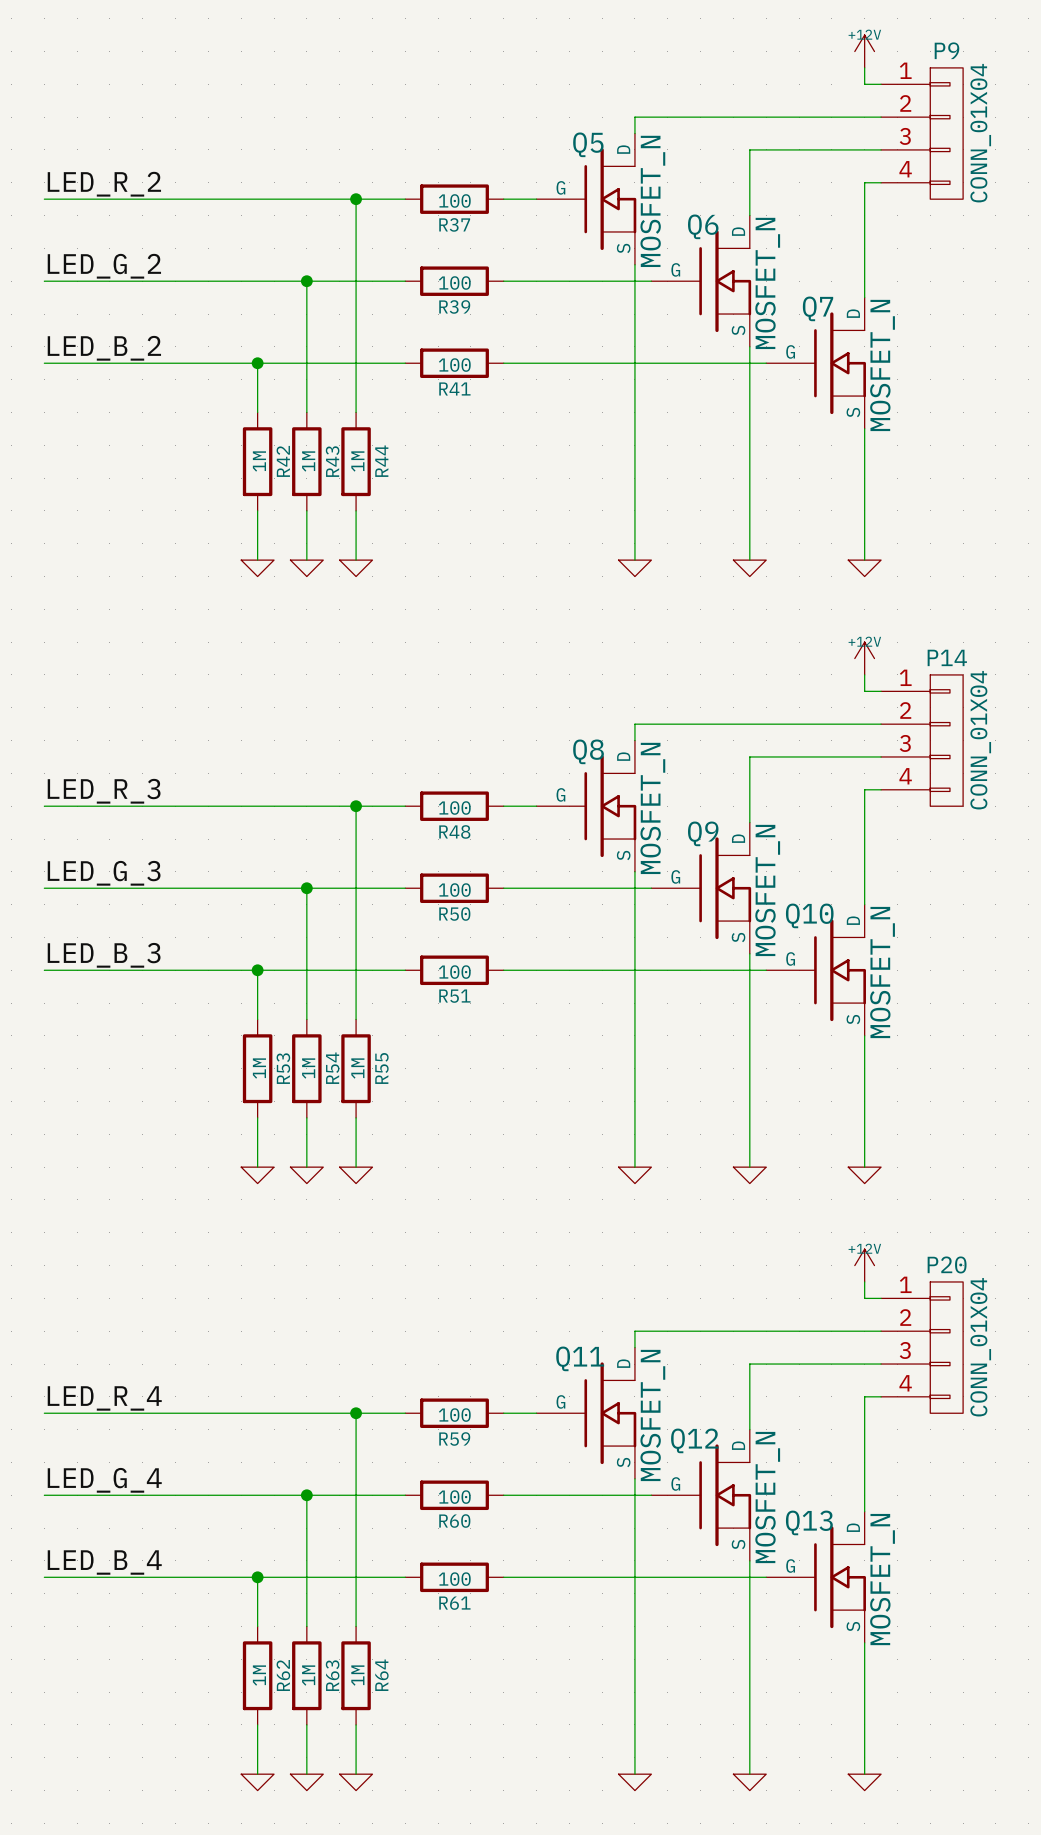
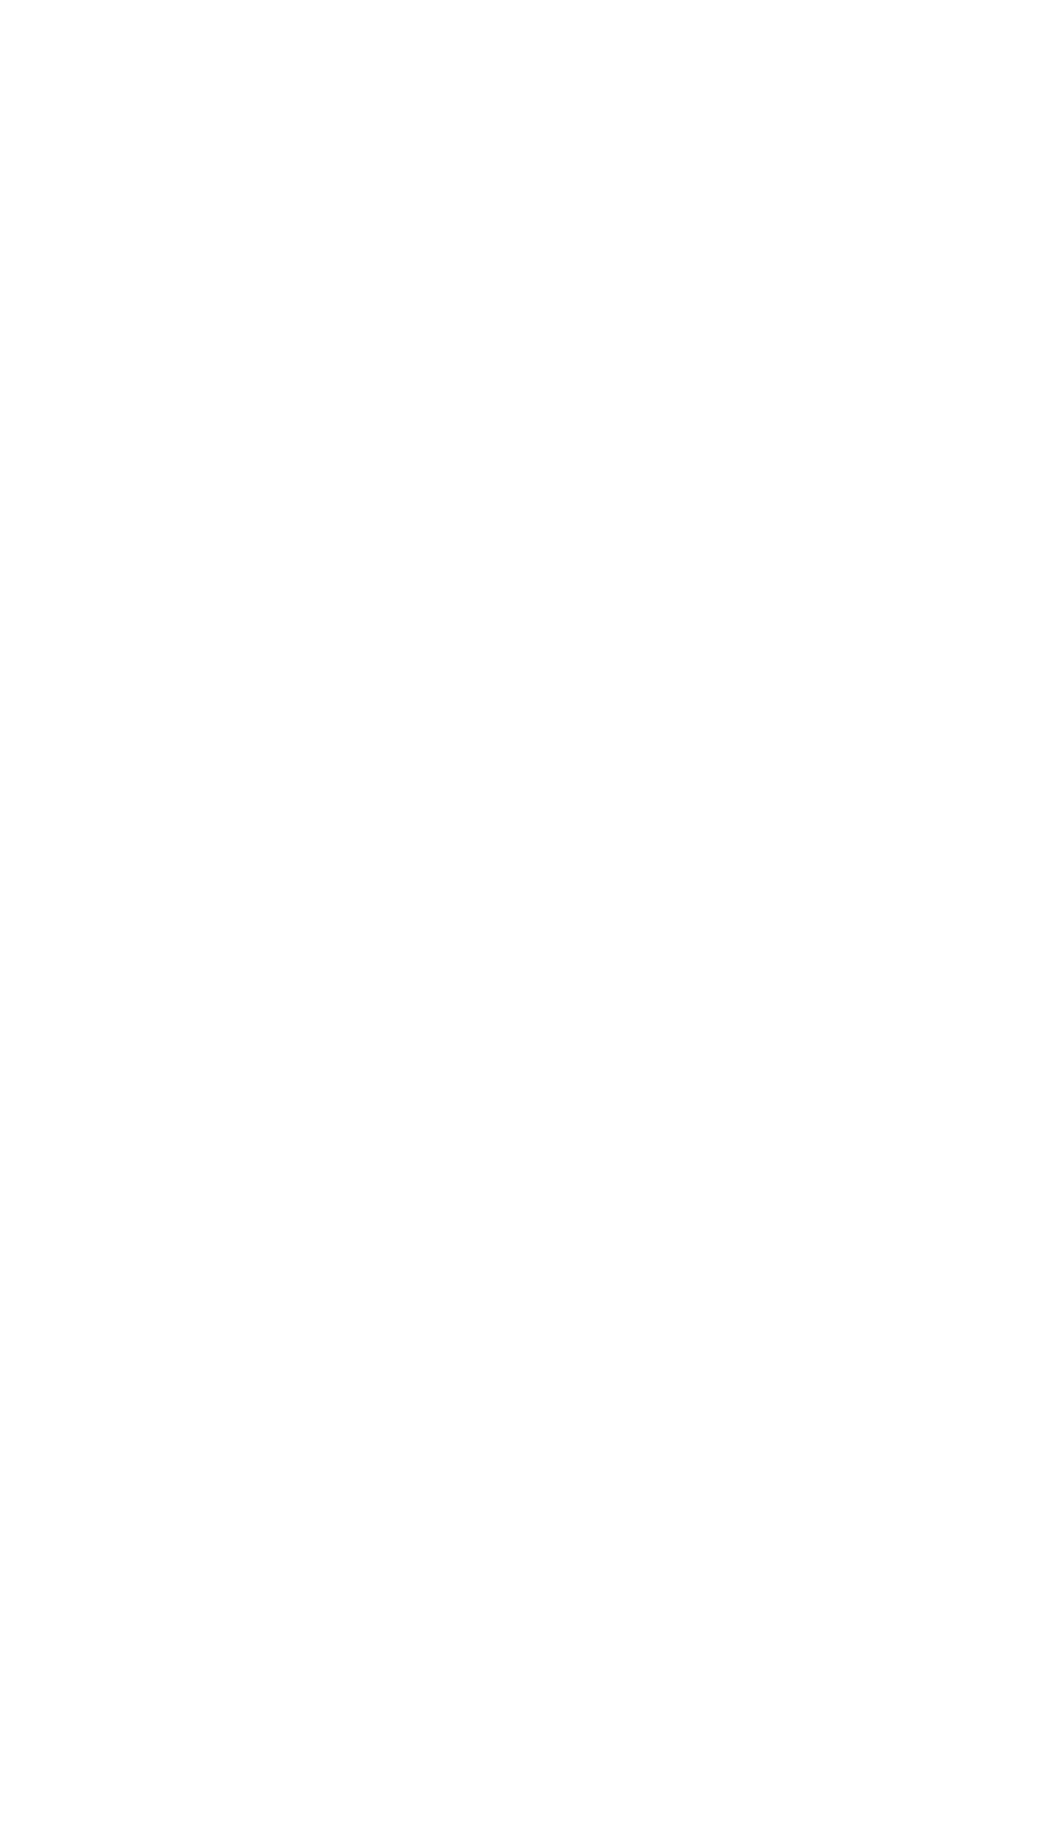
power symbol: +12V (864, 51) -> none
wire: (864, 67) (864, 84) (881, 84) -> none
wire: (881, 117) (634, 117) (634, 133) -> none
P9: CONN_01X04 (922, 133) -> none
wire: (881, 149) (749, 149) (749, 215) -> none
wire: (881, 182) (864, 182) (864, 297) -> none
label: LED_R_2 (104, 184) -> none
wire: (44, 199) (405, 199) -> none
wire: (356, 199) (356, 412) -> none
junction: (356, 199) -> none
R37: 100 (454, 199) -> none
wire: (503, 199) (536, 199) -> none
Q5: MOSFET_N (586, 199) -> none
wire: (634, 264) (634, 560) -> none
label: LED_G_2 (104, 266) -> none
wire: (44, 281) (405, 281) -> none
wire: (306, 281) (306, 412) -> none
junction: (306, 281) -> none
R39: 100 (454, 281) -> none
wire: (503, 281) (651, 281) -> none
Q6: MOSFET_N (701, 281) -> none
wire: (749, 346) (749, 560) -> none
label: LED_B_2 (104, 348) -> none
wire: (44, 363) (405, 363) -> none
wire: (257, 363) (257, 412) -> none
junction: (257, 363) -> none
R41: 100 (454, 363) -> none
wire: (503, 363) (766, 363) -> none
Q7: MOSFET_N (816, 363) -> none
wire: (864, 428) (864, 560) -> none
R42: 1M (257, 461) -> none
R43: 1M (306, 461) -> none
R44: 1M (356, 461) -> none
wire: (257, 510) (257, 560) -> none
wire: (306, 510) (306, 560) -> none
wire: (356, 510) (356, 560) -> none
power symbol: (257, 568) -> none
power symbol: (306, 568) -> none
power symbol: (356, 568) -> none
power symbol: (634, 568) -> none
power symbol: (749, 568) -> none
power symbol: (864, 568) -> none
power symbol: +12V (864, 658) -> none
wire: (864, 674) (864, 691) (881, 691) -> none
wire: (881, 724) (634, 724) (634, 740) -> none
P14: CONN_01X04 (922, 740) -> none
wire: (881, 756) (749, 756) (749, 822) -> none
wire: (881, 789) (864, 789) (864, 904) -> none
label: LED_R_3 (104, 791) -> none
wire: (44, 806) (405, 806) -> none
wire: (356, 806) (356, 1019) -> none
junction: (356, 806) -> none
R48: 100 (454, 806) -> none
wire: (503, 806) (536, 806) -> none
Q8: MOSFET_N (586, 806) -> none
wire: (634, 871) (634, 1167) -> none
label: LED_G_3 (104, 873) -> none
wire: (44, 888) (405, 888) -> none
wire: (306, 888) (306, 1019) -> none
junction: (306, 888) -> none
R50: 100 (454, 888) -> none
wire: (503, 888) (651, 888) -> none
Q9: MOSFET_N (701, 888) -> none
wire: (749, 953) (749, 1167) -> none
label: LED_B_3 (104, 955) -> none
wire: (44, 970) (405, 970) -> none
wire: (257, 970) (257, 1019) -> none
junction: (257, 970) -> none
R51: 100 (454, 970) -> none
wire: (503, 970) (766, 970) -> none
Q10: MOSFET_N (816, 970) -> none
wire: (864, 1035) (864, 1167) -> none
R53: 1M (257, 1068) -> none
R54: 1M (306, 1068) -> none
R55: 1M (356, 1068) -> none
wire: (257, 1117) (257, 1167) -> none
wire: (306, 1117) (306, 1167) -> none
wire: (356, 1117) (356, 1167) -> none
power symbol: (257, 1175) -> none
power symbol: (306, 1175) -> none
power symbol: (356, 1175) -> none
power symbol: (634, 1175) -> none
power symbol: (749, 1175) -> none
power symbol: (864, 1175) -> none
power symbol: +12V (864, 1265) -> none
wire: (864, 1281) (864, 1298) (881, 1298) -> none
wire: (881, 1331) (634, 1331) (634, 1347) -> none
P20: CONN_01X04 (922, 1347) -> none
wire: (881, 1364) (749, 1364) (749, 1429) -> none
wire: (881, 1396) (864, 1396) (864, 1511) -> none
label: LED_R_4 (104, 1398) -> none
wire: (44, 1413) (405, 1413) -> none
wire: (356, 1413) (356, 1626) -> none
junction: (356, 1413) -> none
R59: 100 (454, 1413) -> none
wire: (503, 1413) (536, 1413) -> none
Q11: MOSFET_N (586, 1413) -> none
wire: (634, 1478) (634, 1774) -> none
label: LED_G_4 (104, 1480) -> none
wire: (44, 1495) (405, 1495) -> none
wire: (306, 1495) (306, 1626) -> none
junction: (306, 1495) -> none
R60: 100 (454, 1495) -> none
wire: (503, 1495) (651, 1495) -> none
Q12: MOSFET_N (701, 1495) -> none
wire: (749, 1560) (749, 1774) -> none
label: LED_B_4 (104, 1562) -> none
wire: (44, 1577) (405, 1577) -> none
wire: (257, 1577) (257, 1626) -> none
junction: (257, 1577) -> none
R61: 100 (454, 1577) -> none
wire: (503, 1577) (766, 1577) -> none
Q13: MOSFET_N (816, 1577) -> none
wire: (864, 1642) (864, 1774) -> none
R62: 1M (257, 1675) -> none
R63: 1M (306, 1675) -> none
R64: 1M (356, 1675) -> none
wire: (257, 1724) (257, 1774) -> none
wire: (306, 1724) (306, 1774) -> none
wire: (356, 1724) (356, 1774) -> none
power symbol: (257, 1782) -> none
power symbol: (306, 1782) -> none
power symbol: (356, 1782) -> none
power symbol: (634, 1782) -> none
power symbol: (749, 1782) -> none
power symbol: (864, 1782) -> none

